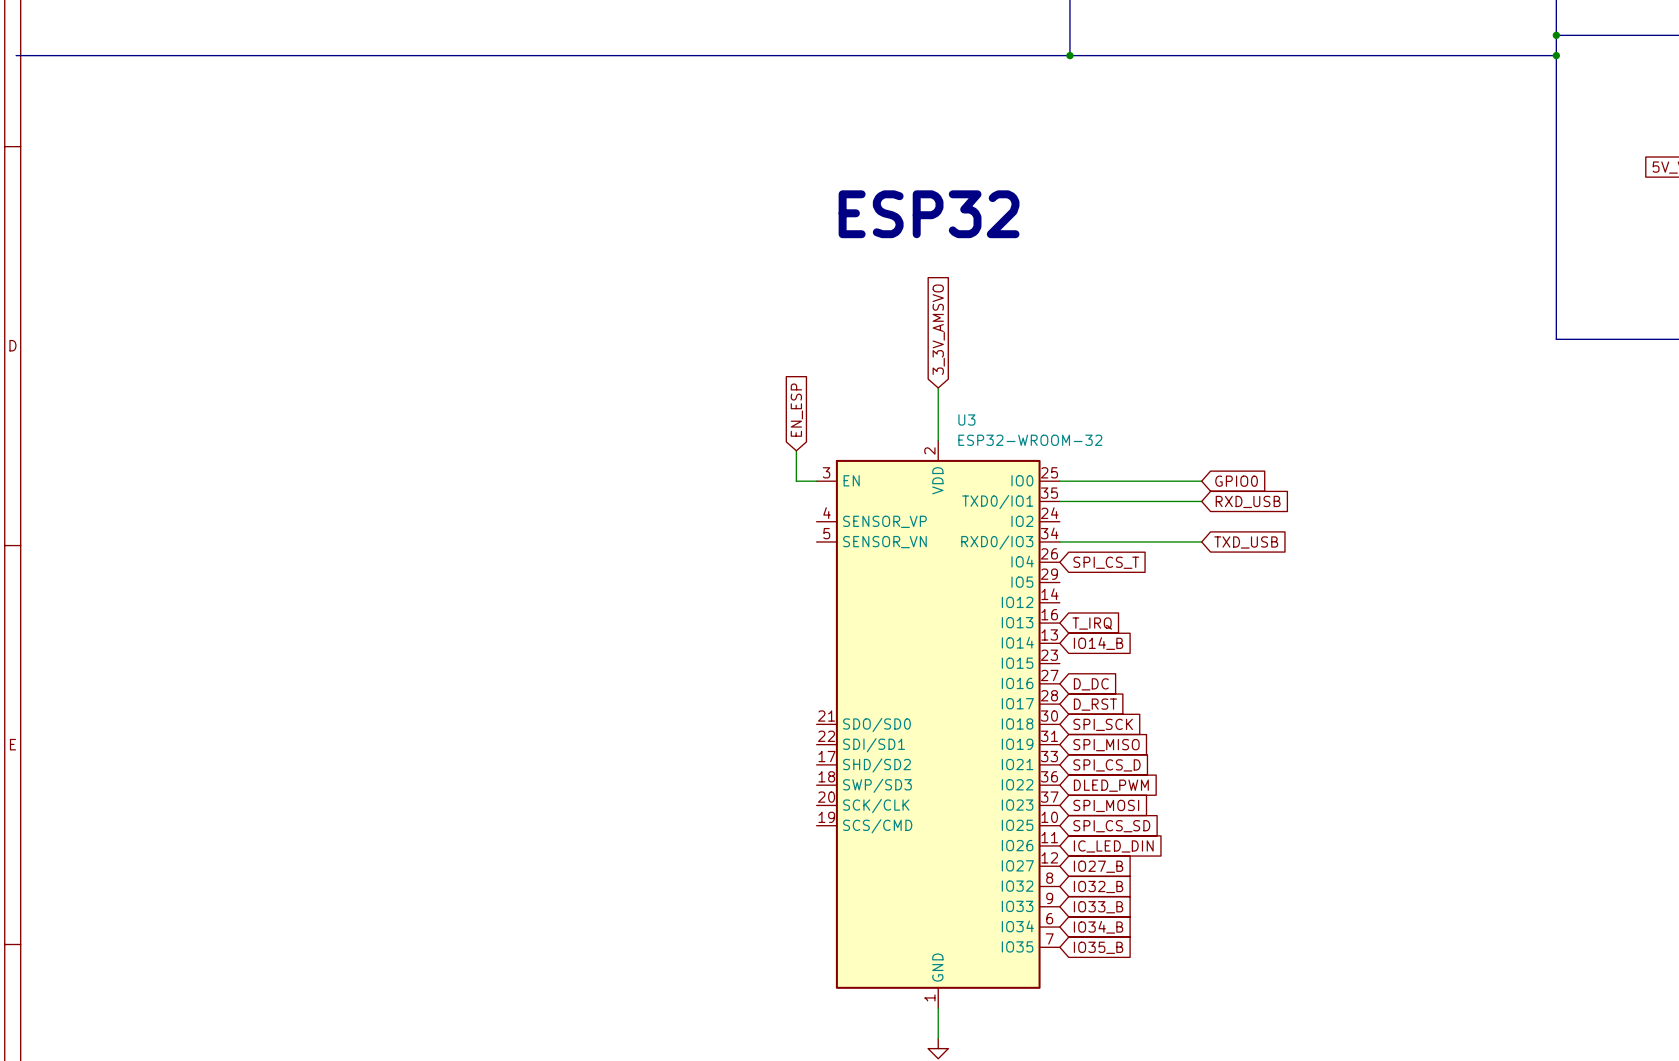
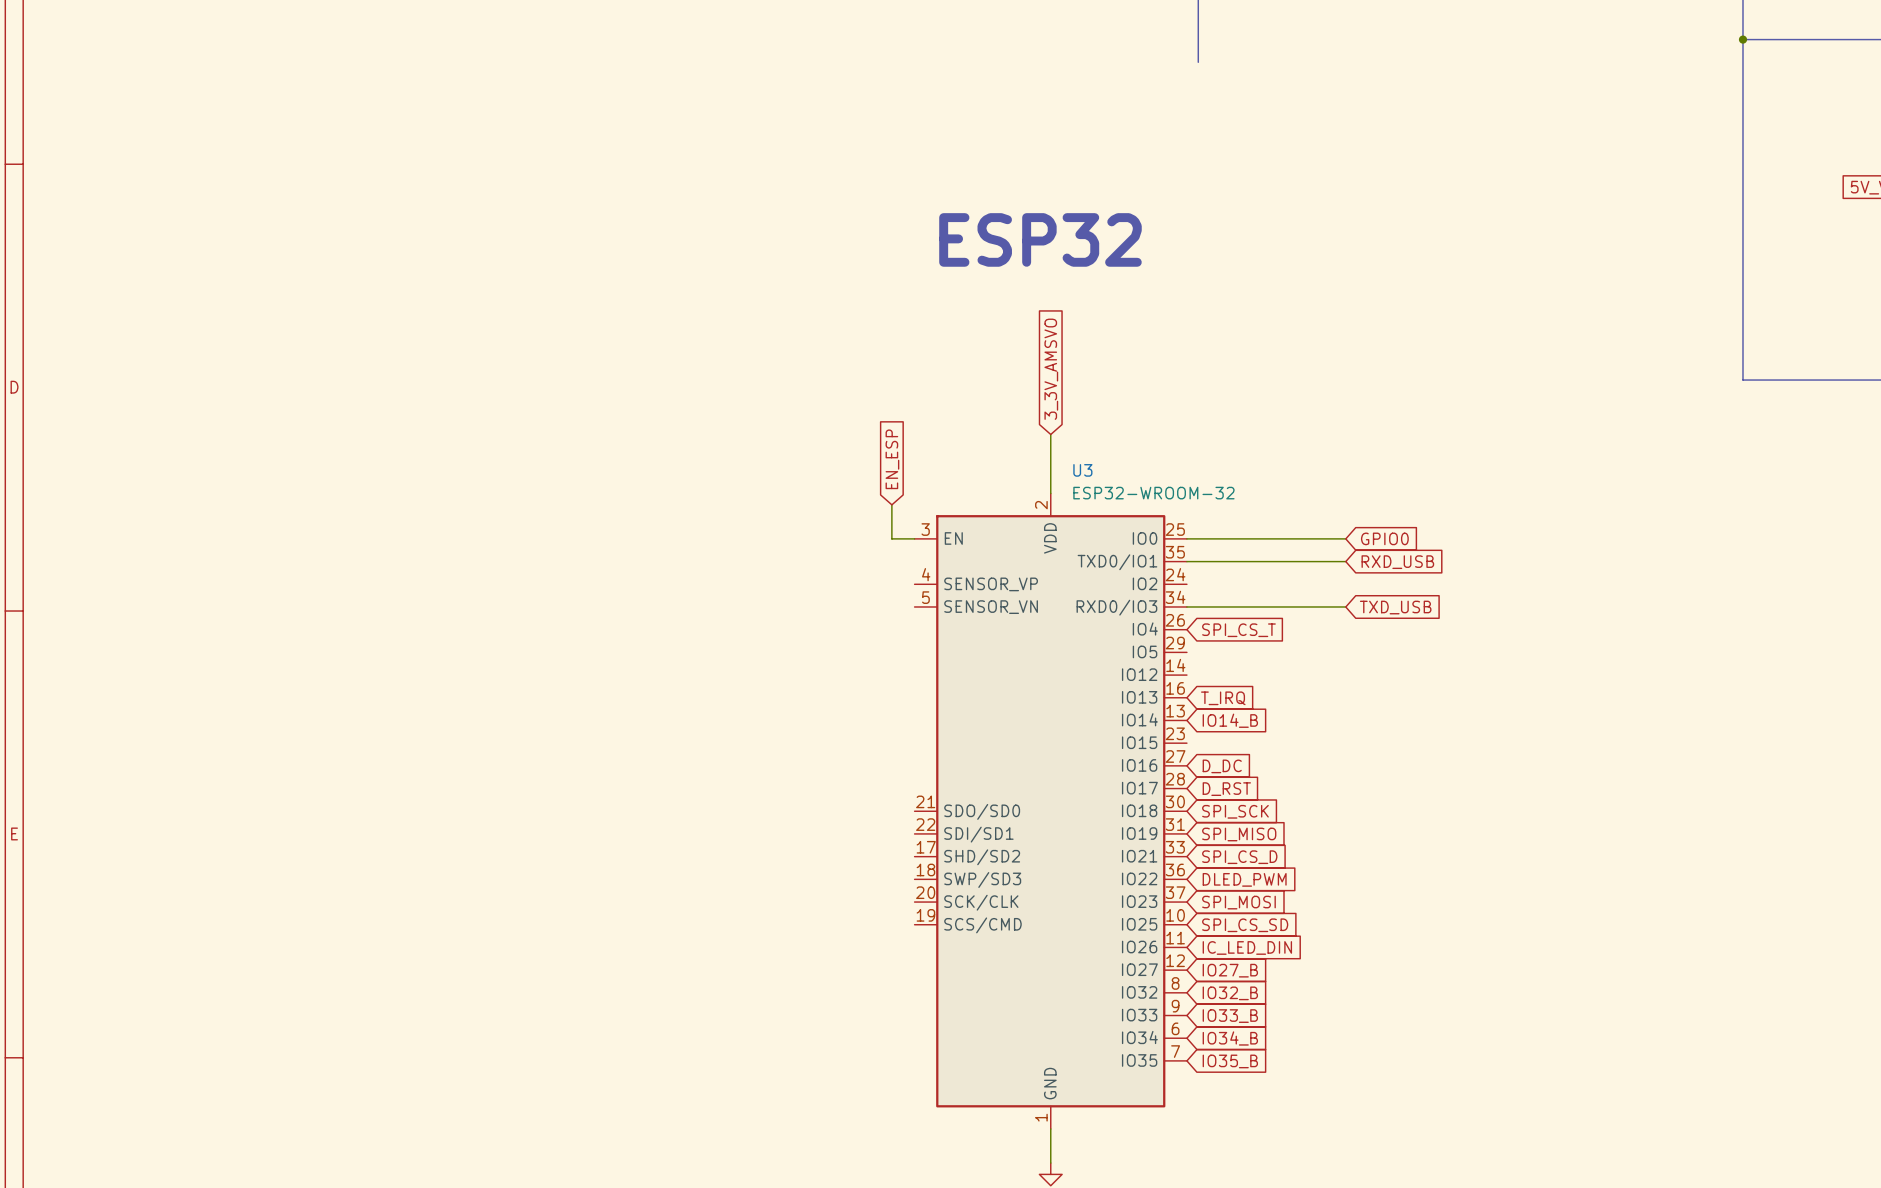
bus: (16, 55) (1556, 55) -> none
junction: (1069, 55) -> none
junction: (1556, 55) -> none

